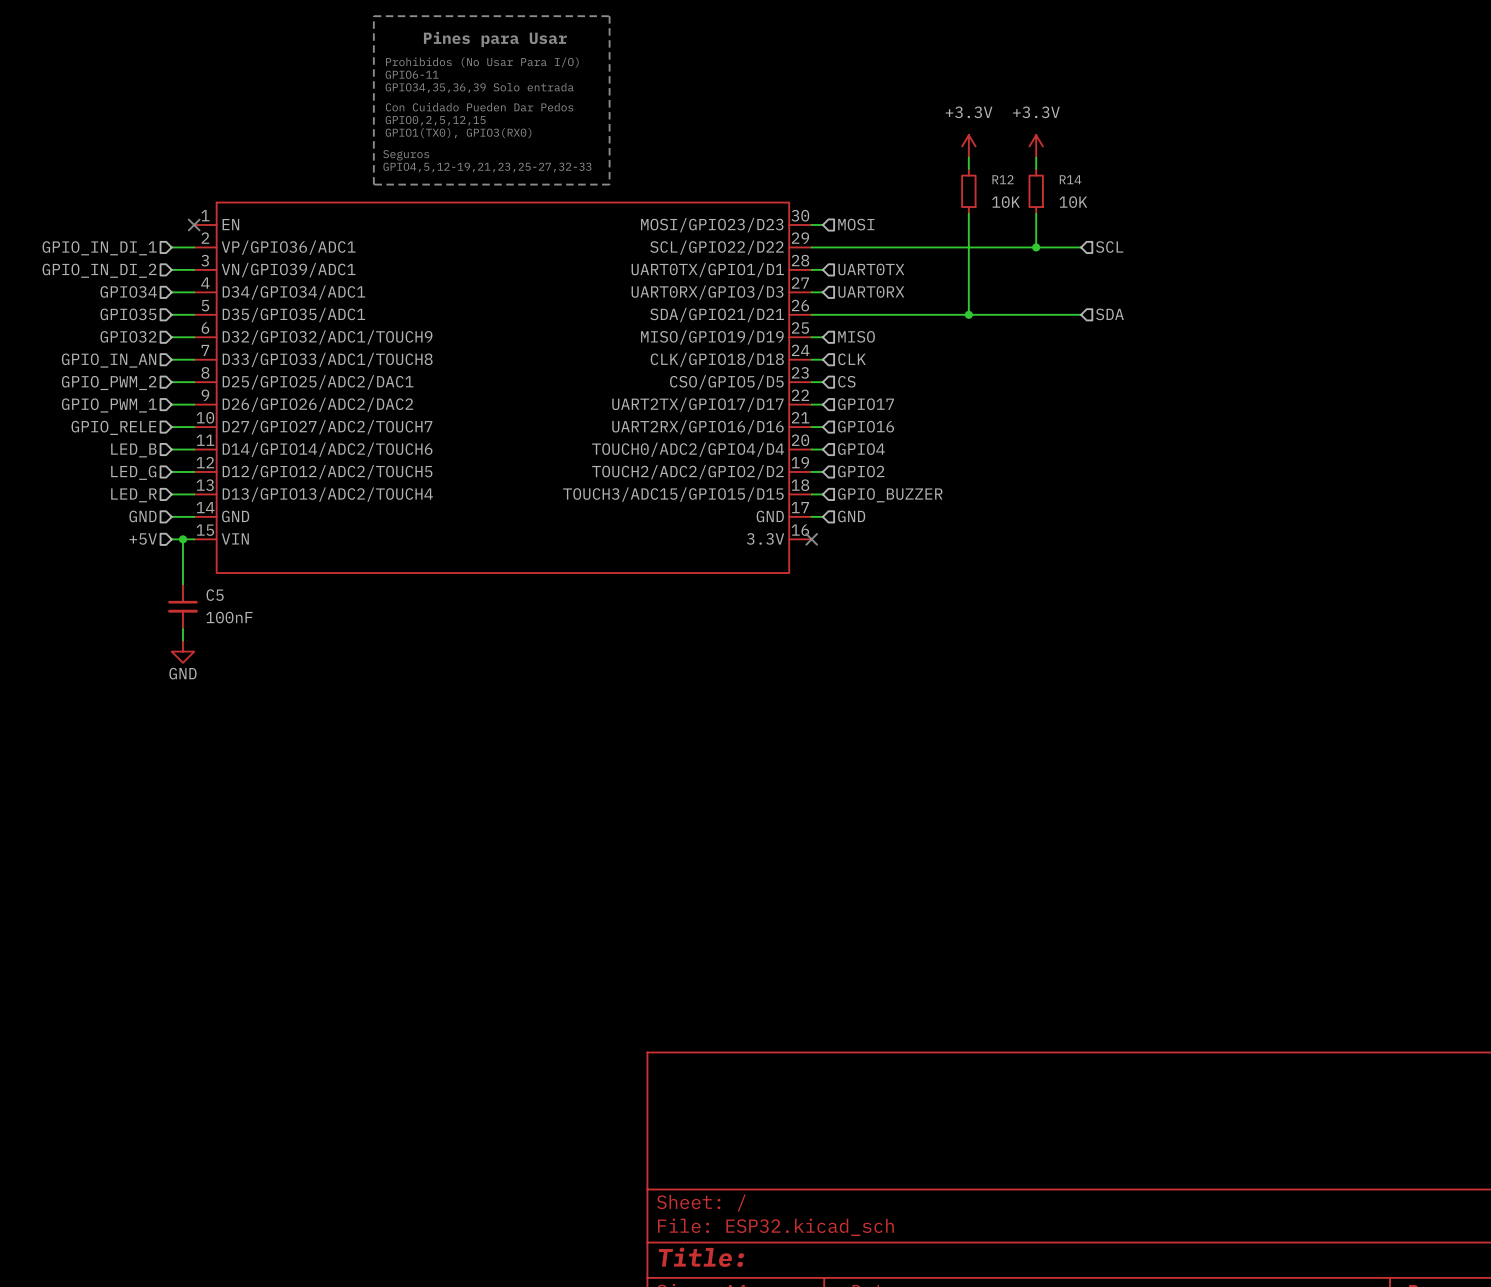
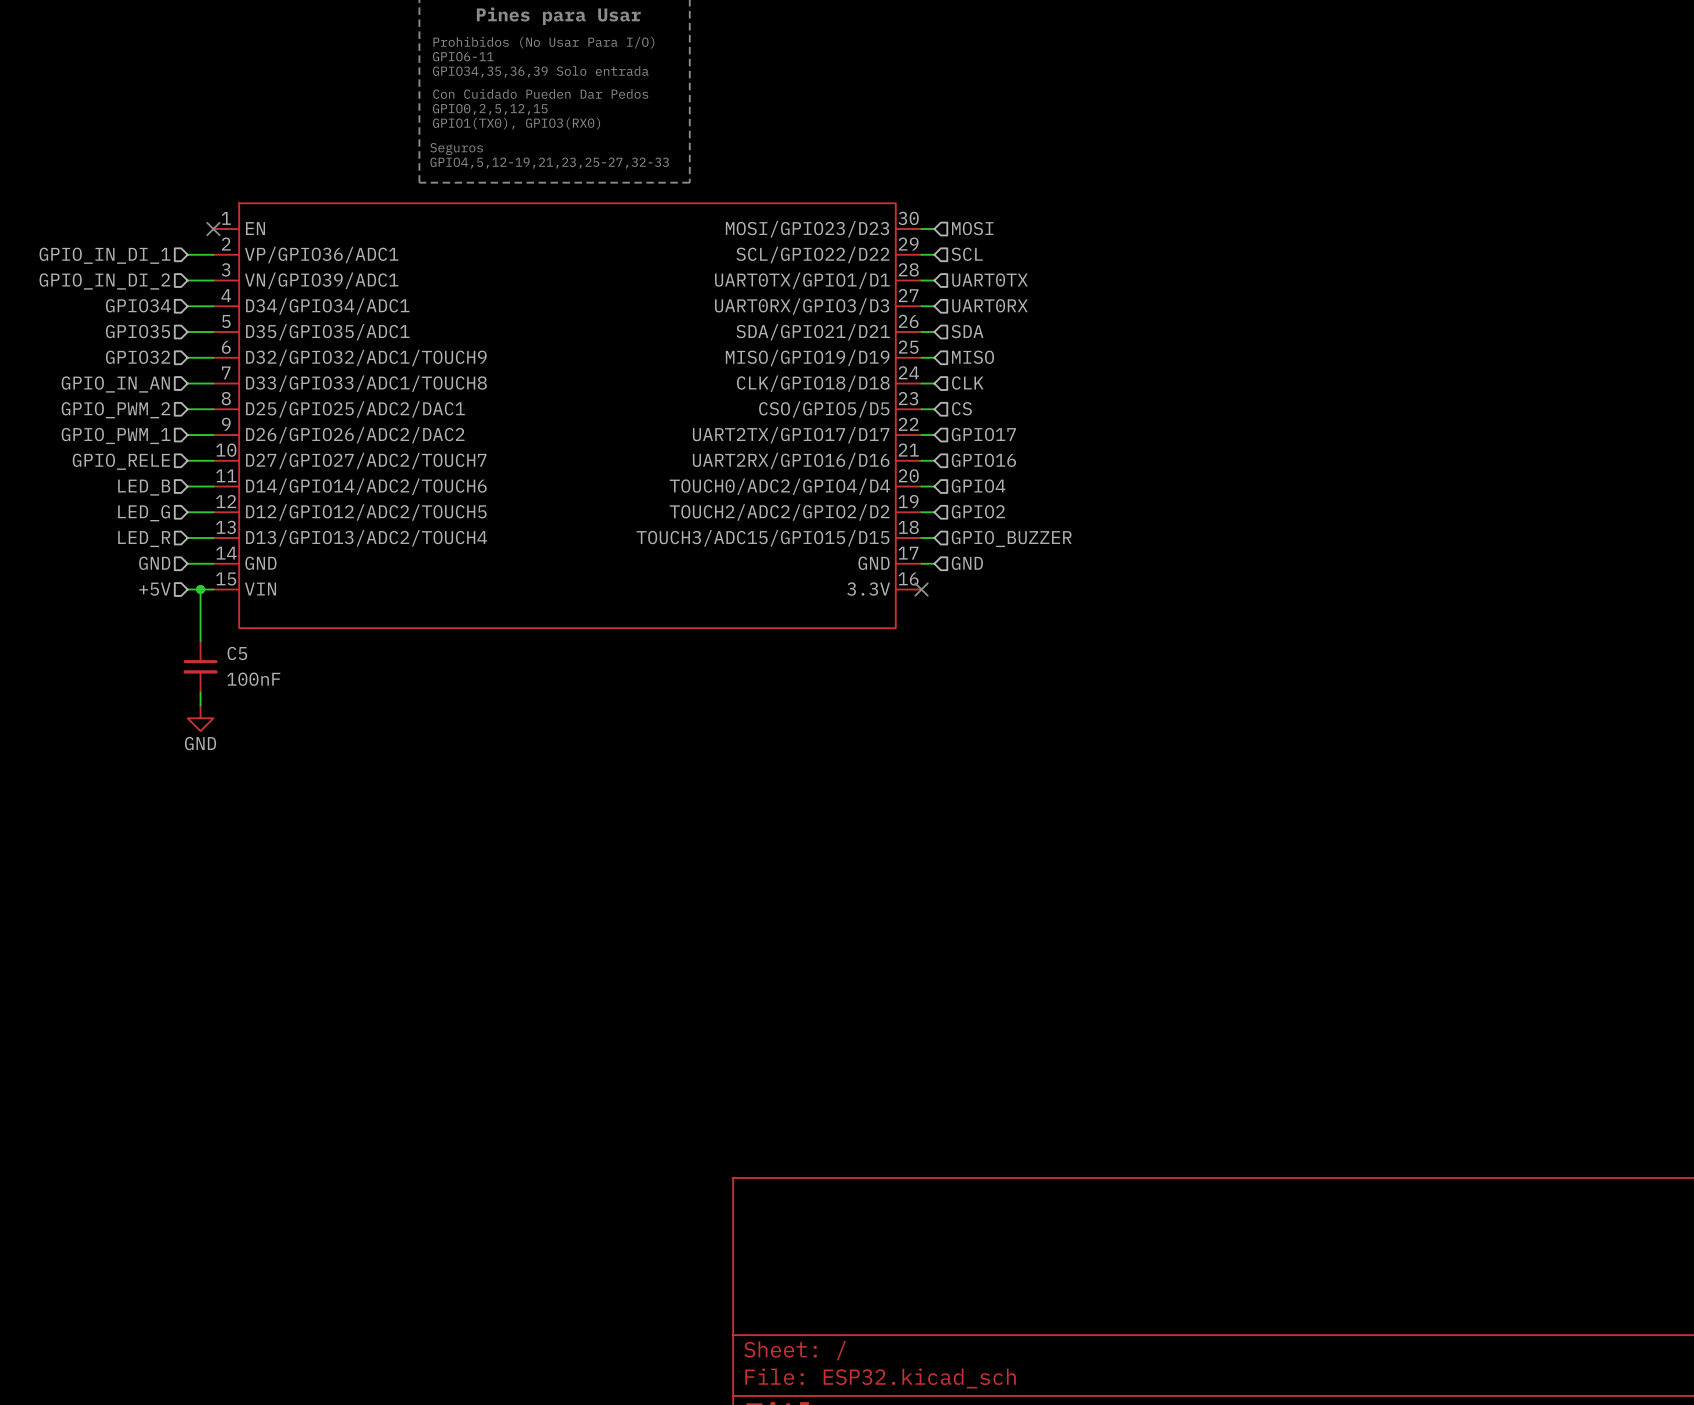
power symbol: +3.3V (968, 146) -> none
power symbol: +3.3V (1036, 146) -> none
wire: (968, 157) (968, 168) -> none
wire: (1036, 157) (1036, 168) -> none
R12: 10K (968, 191) -> none
R14: 10K (1036, 191) -> none
wire: (968, 213) (968, 314) -> none
wire: (1036, 213) (1036, 247) -> none
wire: (822, 247) (1081, 247) -> none
hierarchical label: none -> SCL (967, 254)
junction: (1036, 247) -> none
hierarchical label: SCL (1109, 247) -> none
wire: (822, 314) (1081, 314) -> none
hierarchical label: none -> SDA (967, 331)
junction: (968, 314) -> none
hierarchical label: SDA (1109, 314) -> none

